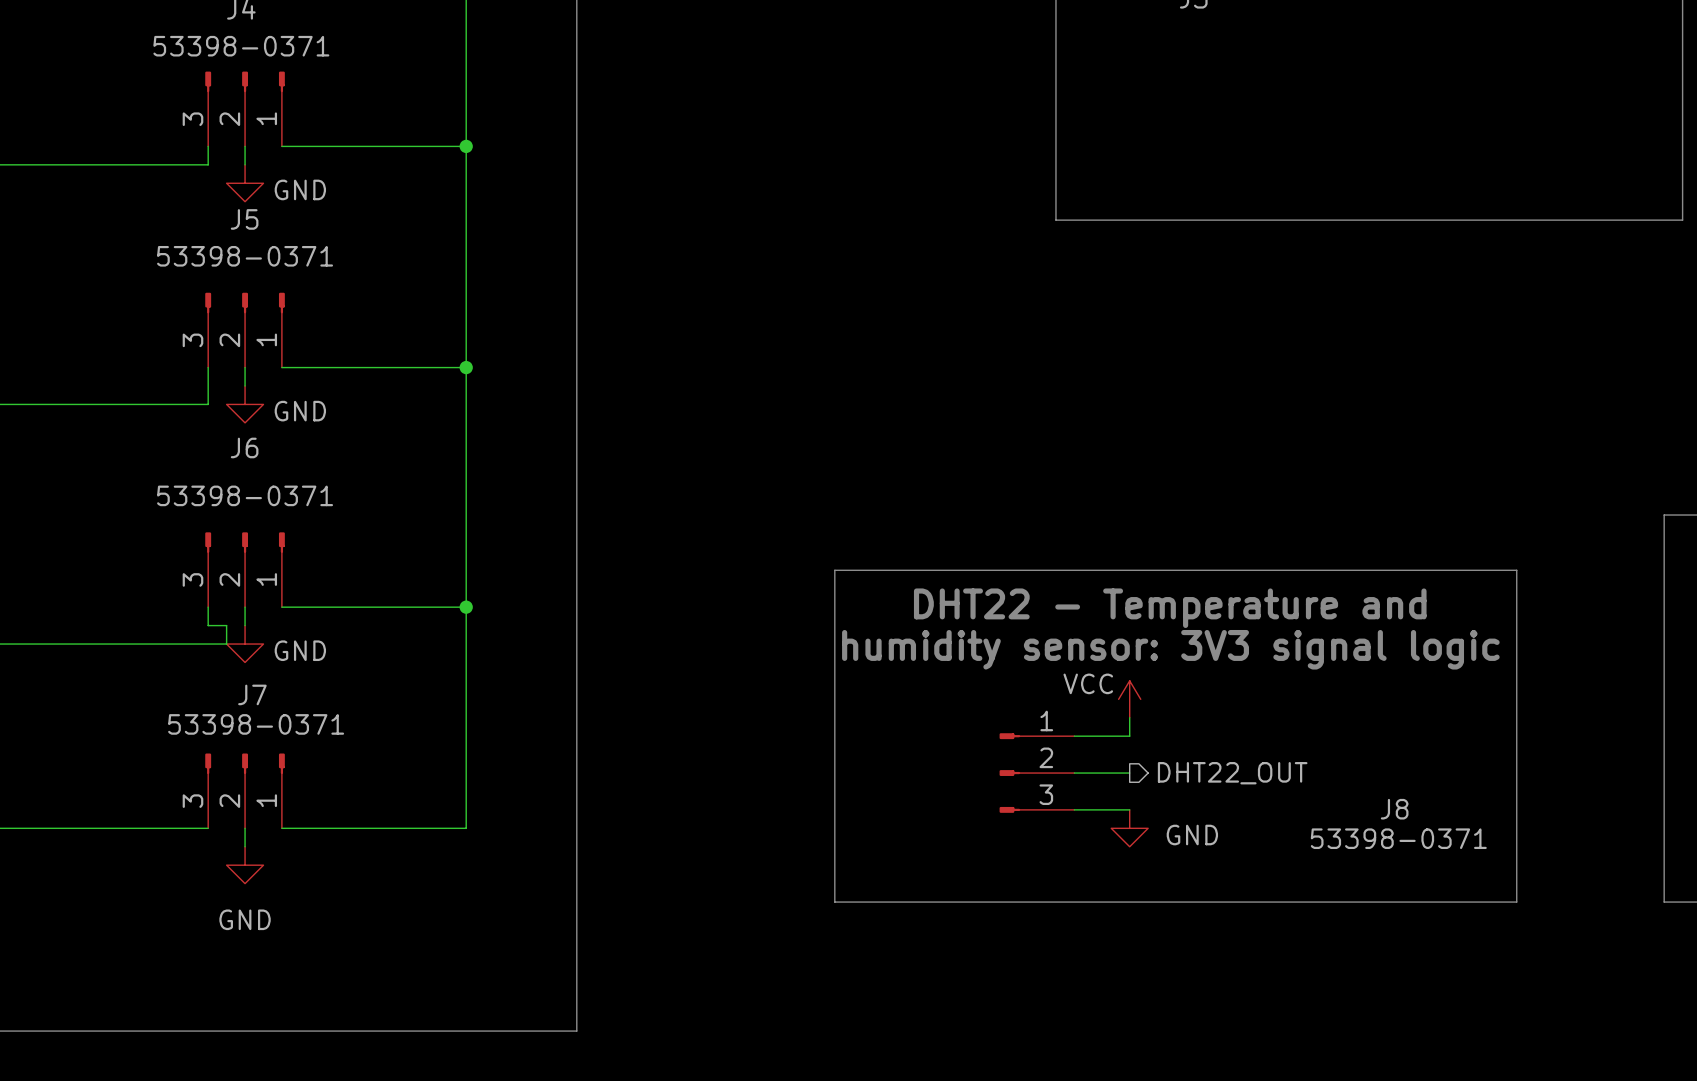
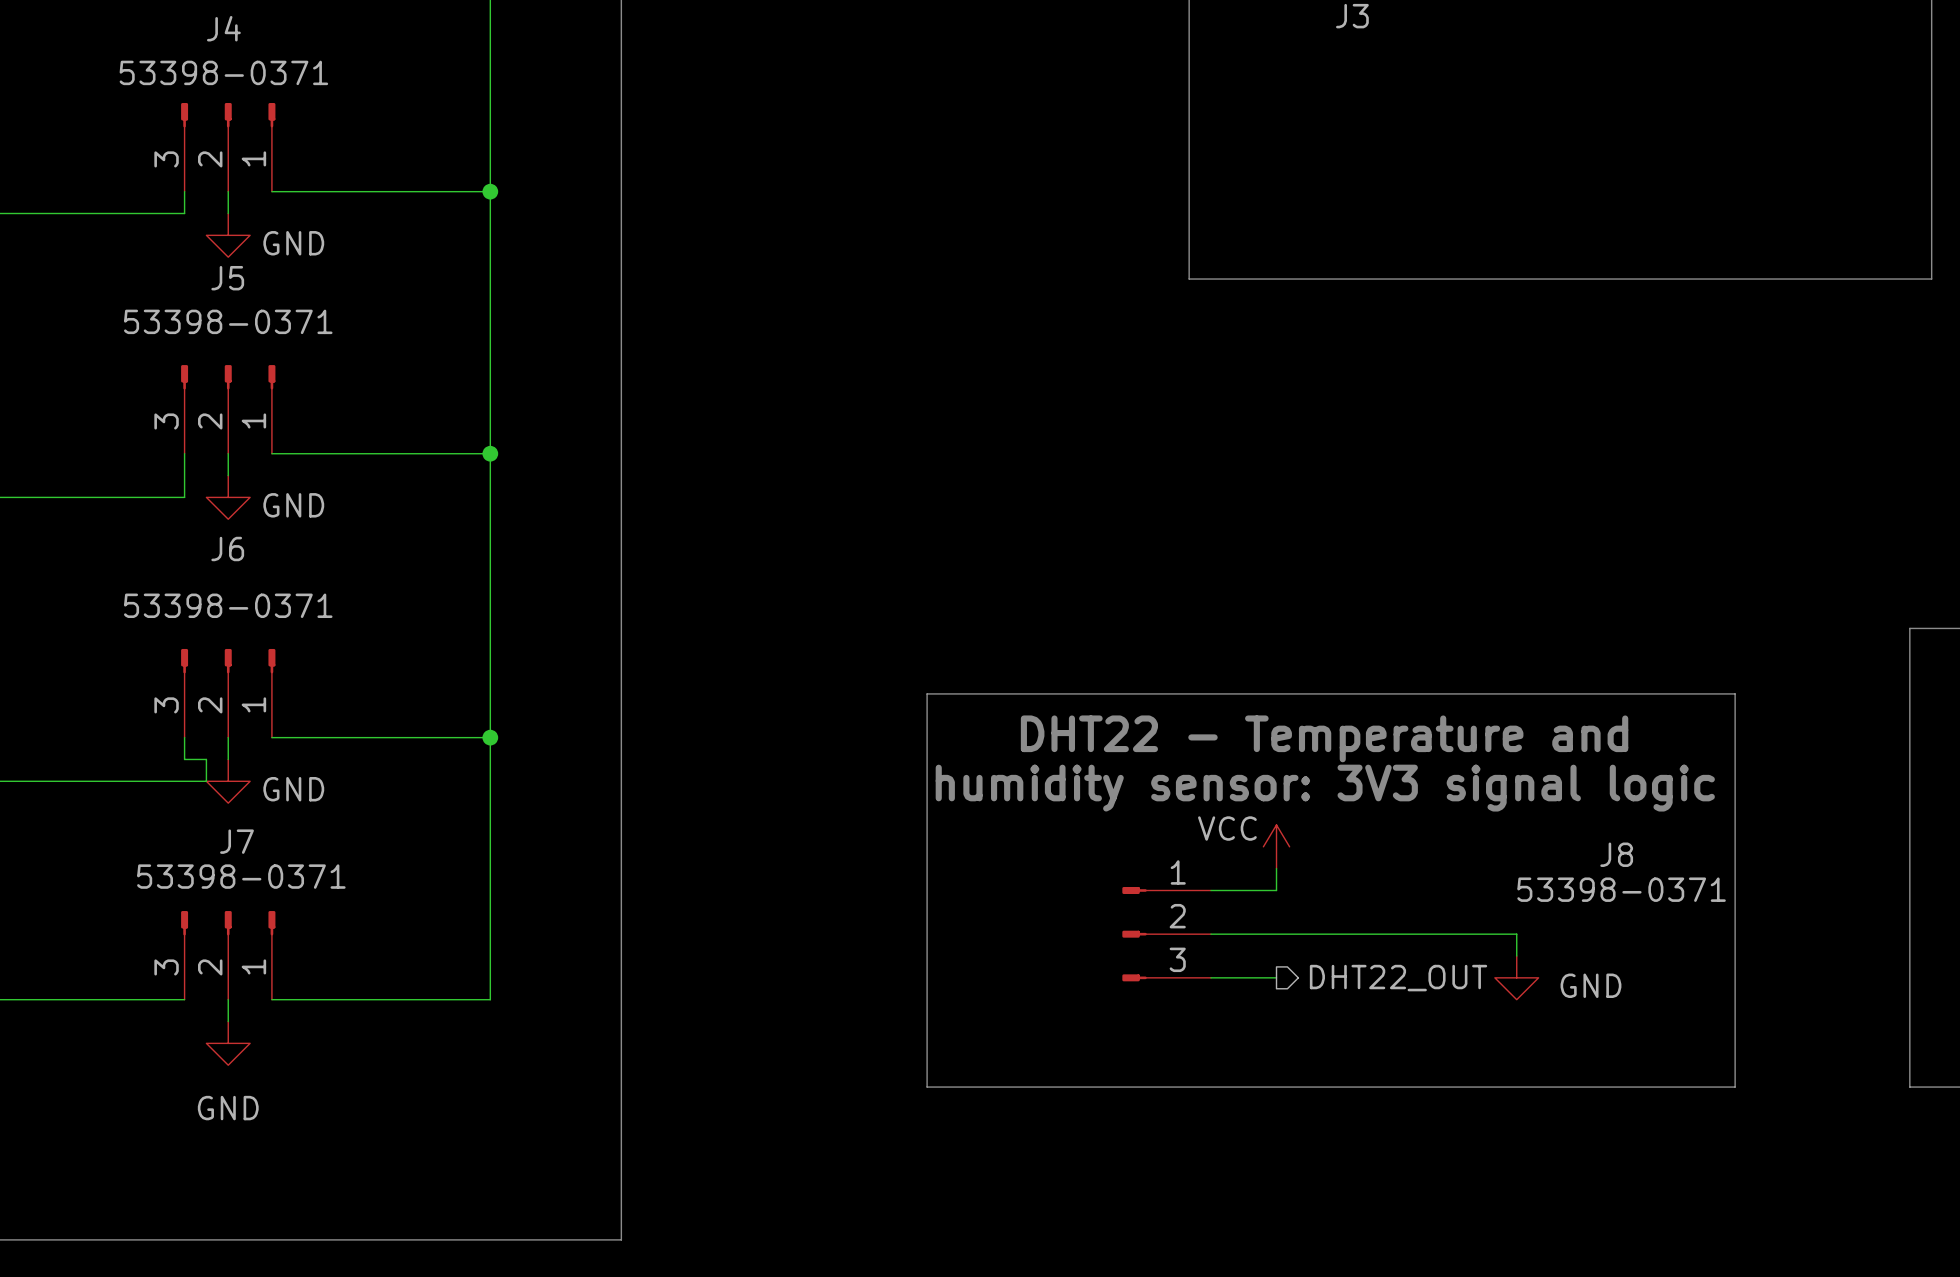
wire: none -> (1276, 934) (1516, 934) (1516, 956)
hierarchical label position: DHT22_OUT (1232, 773) -> DHT22_OUT (1398, 978)
J8 name position: J8 (1394, 809) -> J8 (1616, 854)
power symbol position: GND (1129, 828) -> GND (1516, 977)
J8 value position: 53398-0371 (1398, 838) -> 53398-0371 (1621, 889)

